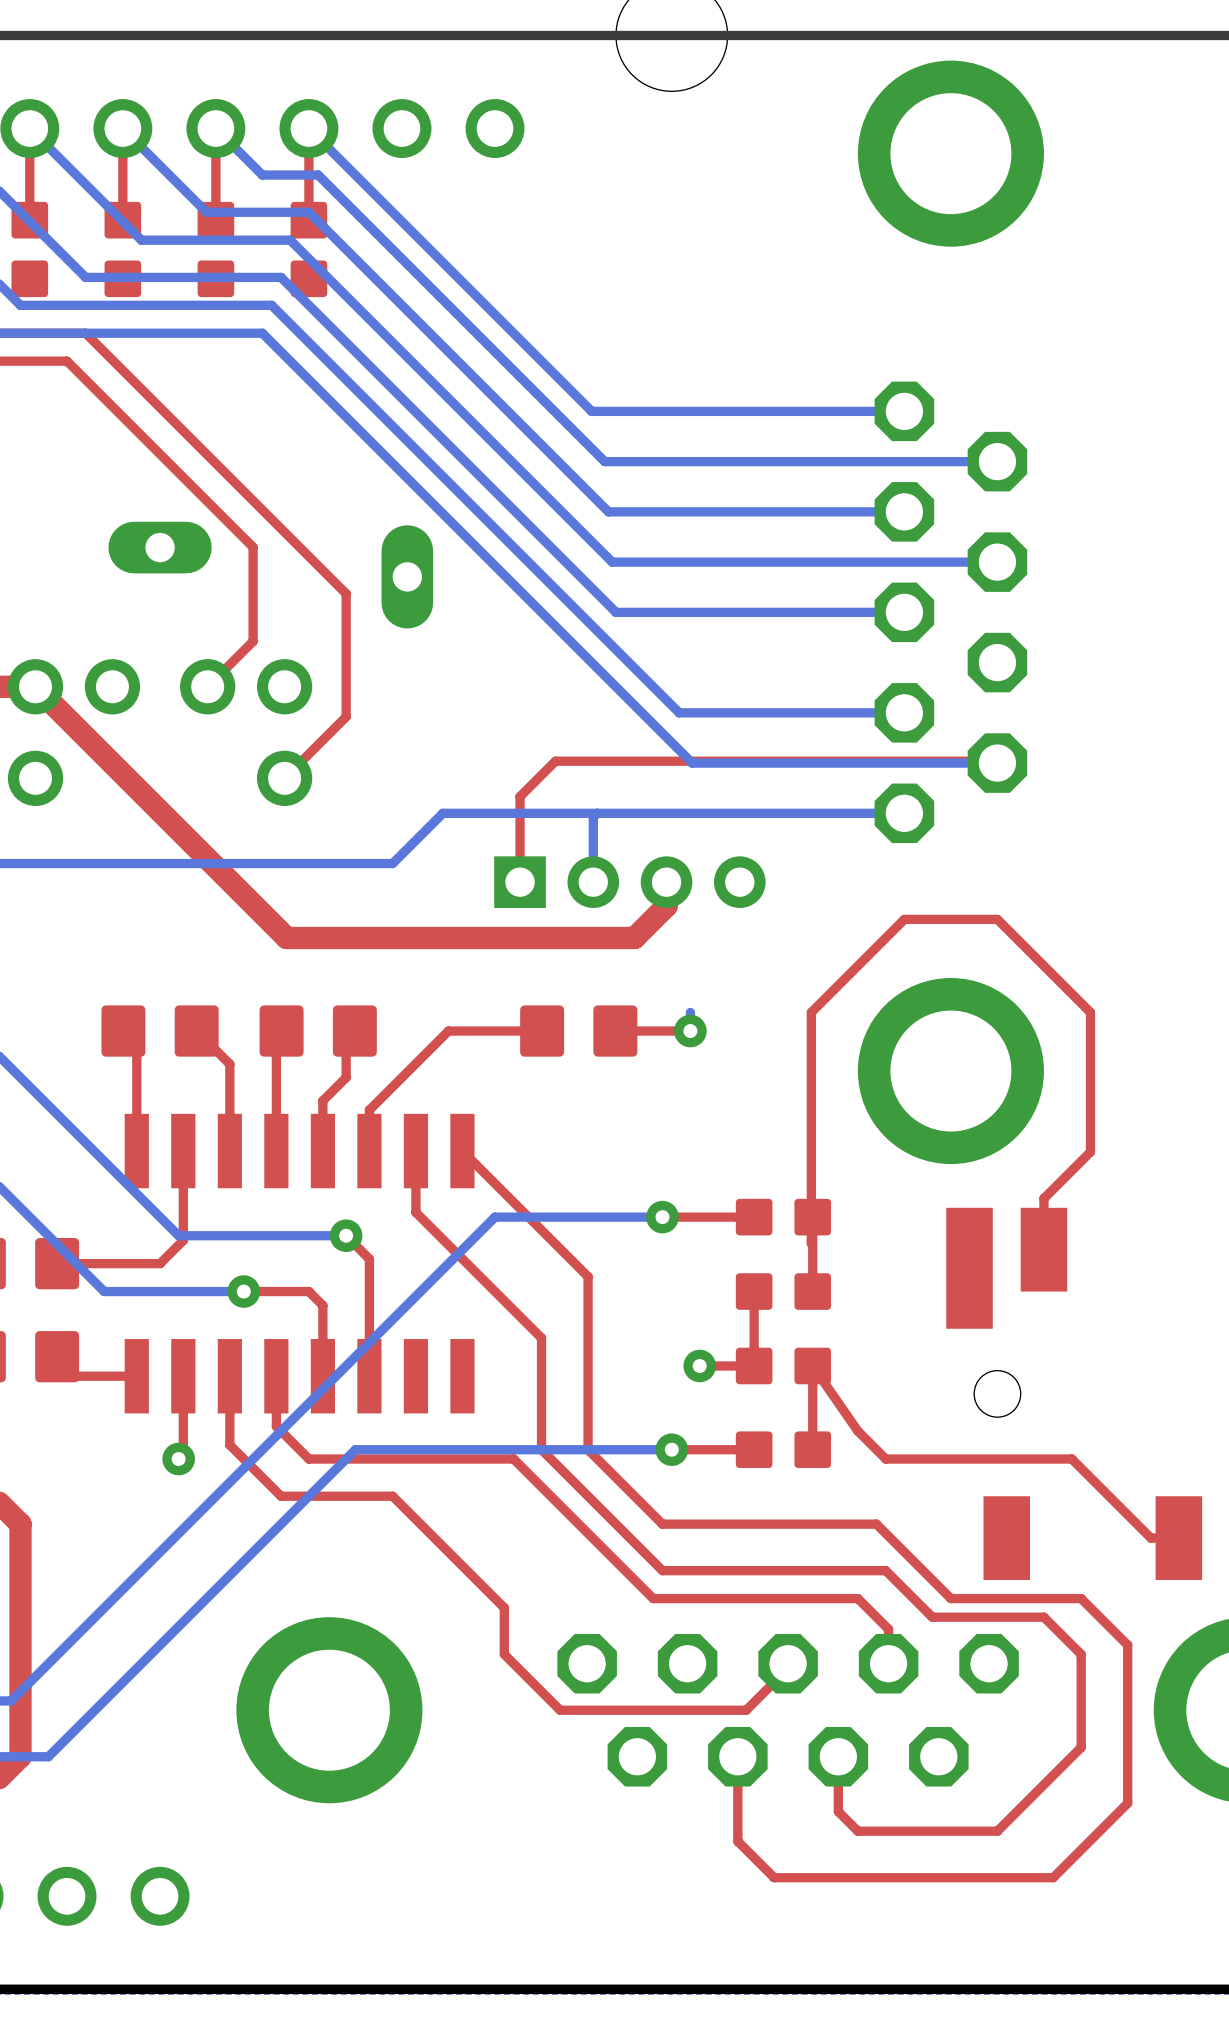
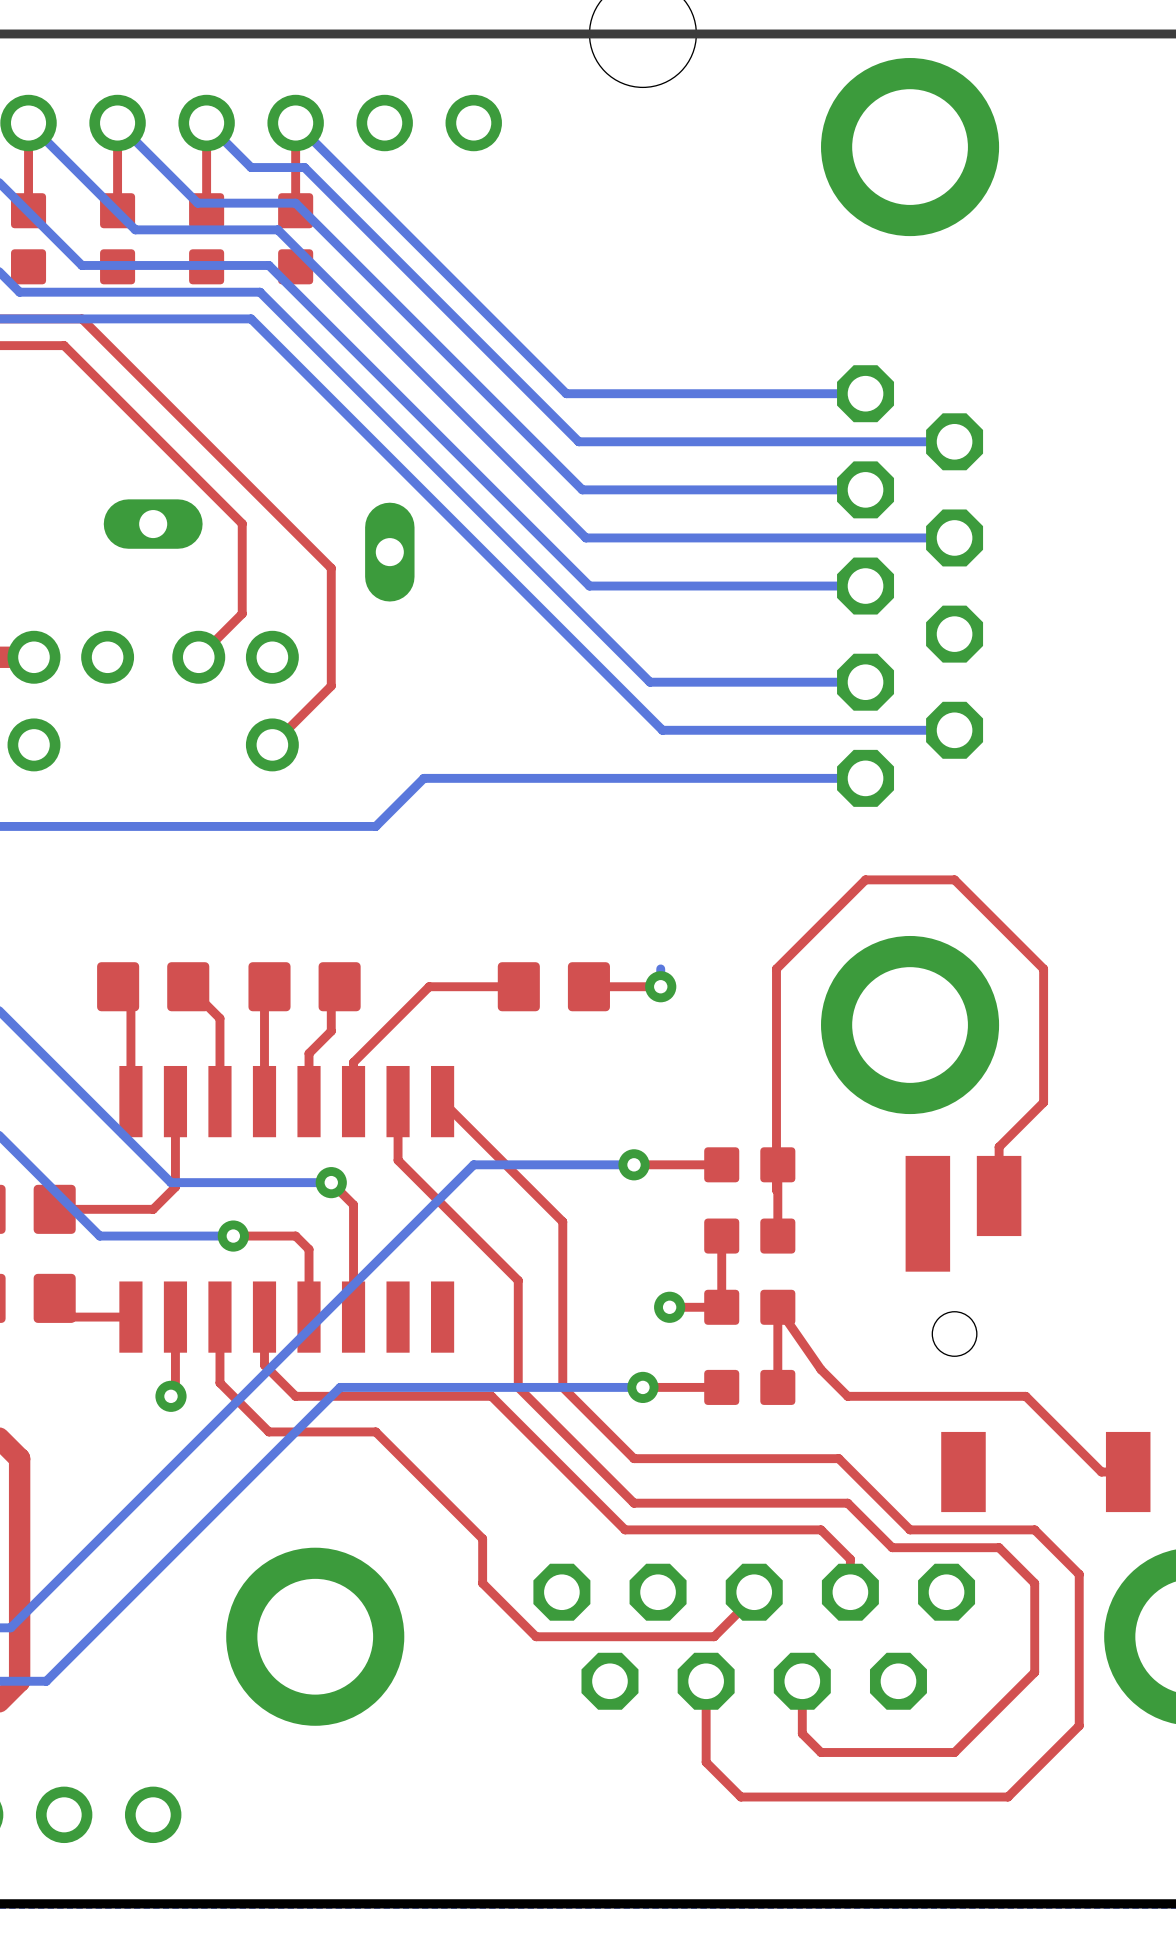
top track: (35, 686) (286, 937) (634, 937) (666, 906) (666, 882) -> none
top track: (997, 763) (995, 761) (555, 761) (520, 796) (520, 882) -> none
bottom track: (597, 813) (593, 817) (593, 882) -> none
part: (629, 882) -> none

